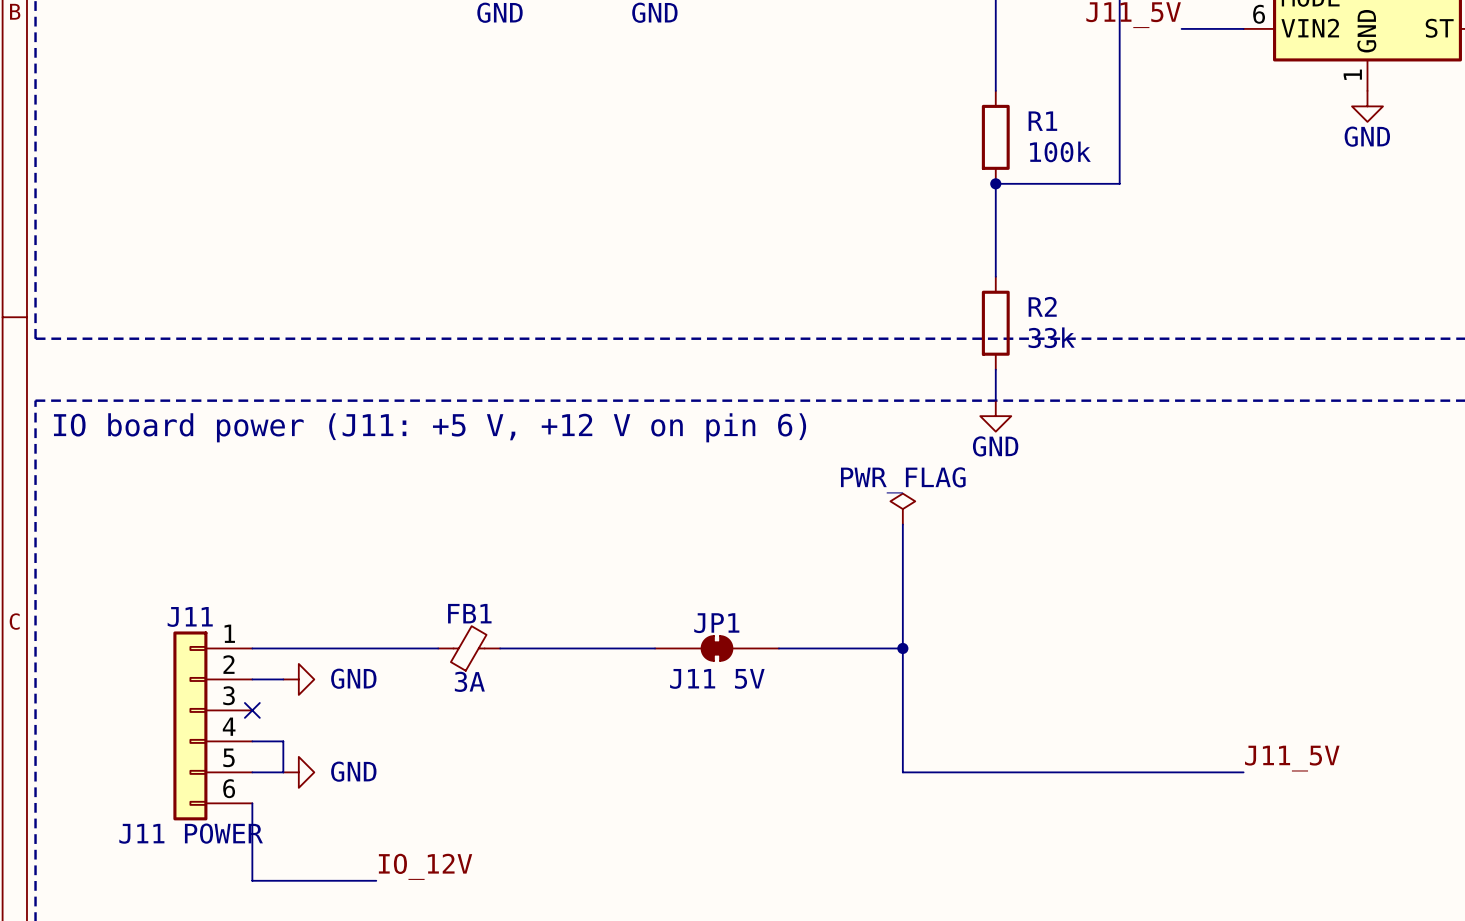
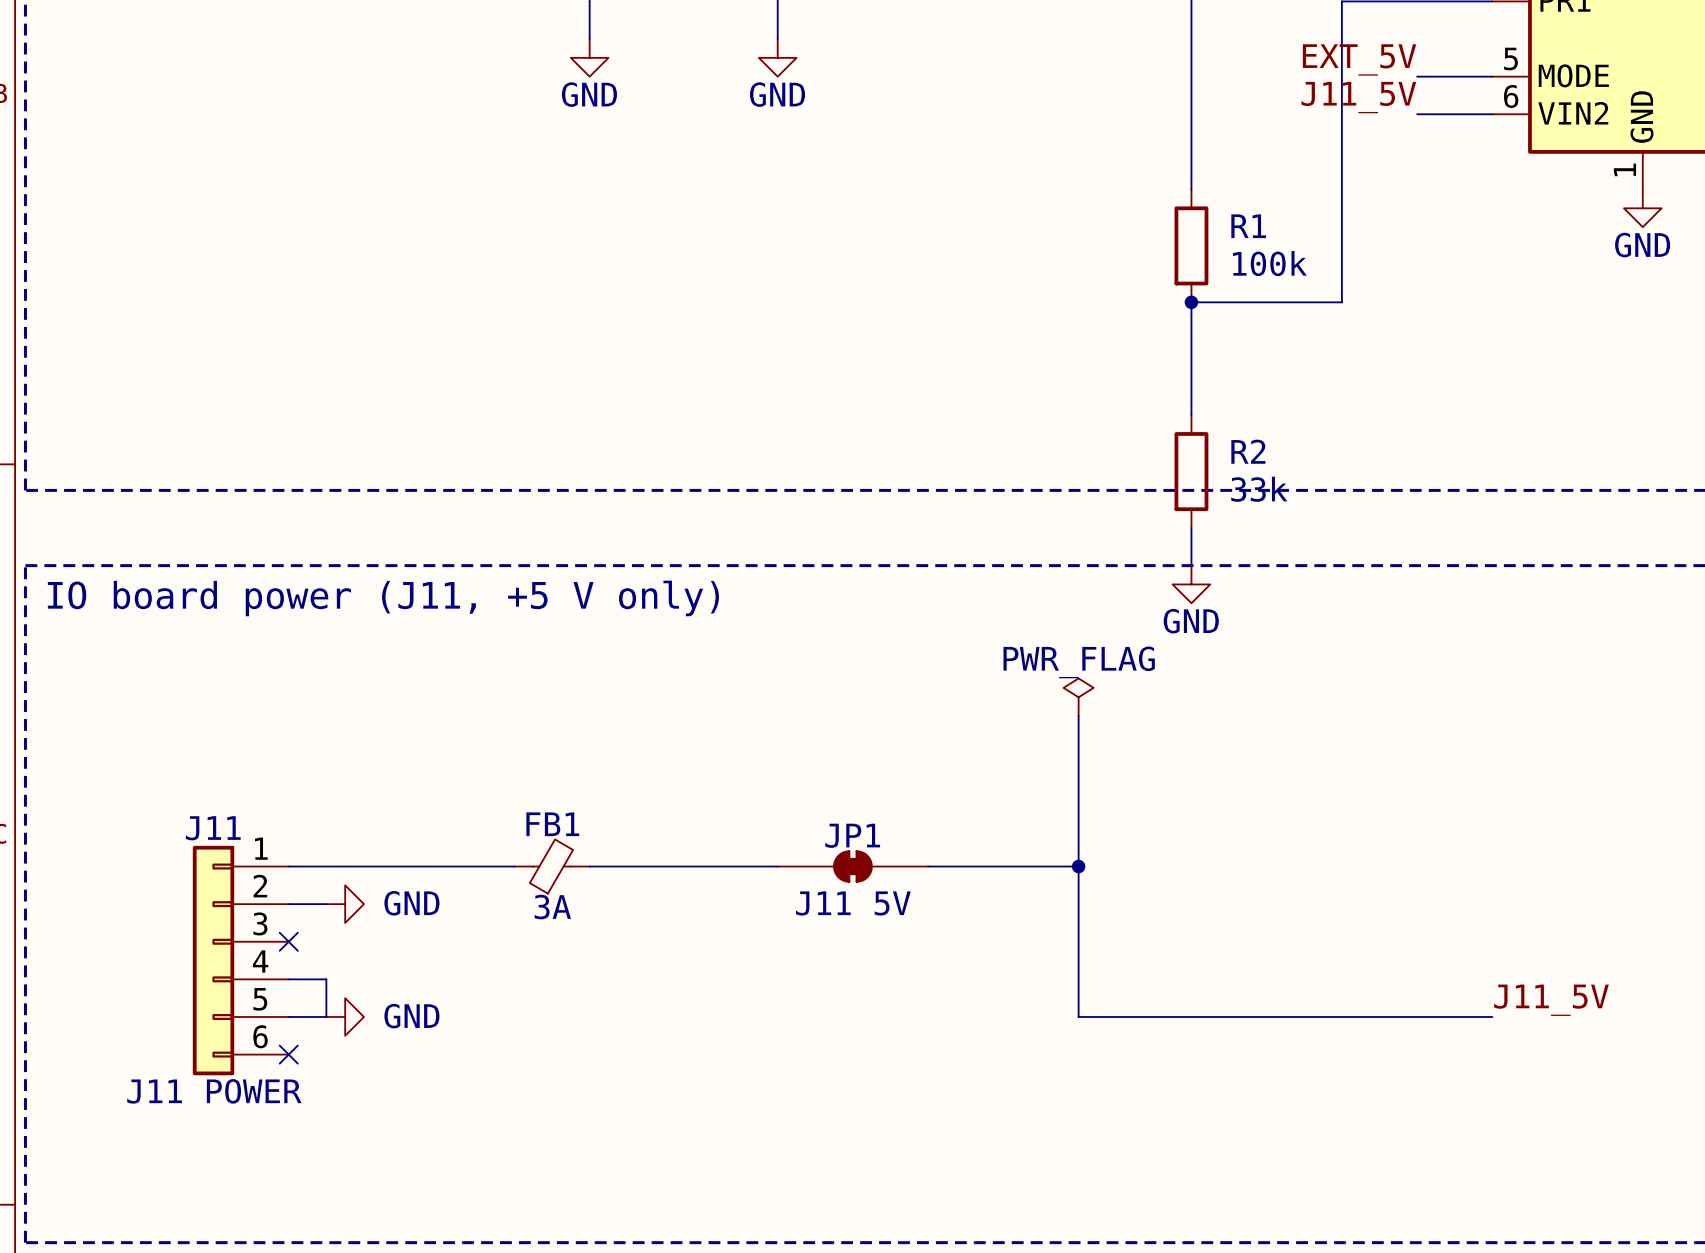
text: IO board power (J11: +5 V, +12 V on pin 6) (430, 427) -> IO board power (J11, +5 V only) (383, 598)
wire: (252, 803) (252, 880) (376, 880) -> none
no-connect mark: none -> (288, 1054)
label: IO_12V (425, 866) -> none

